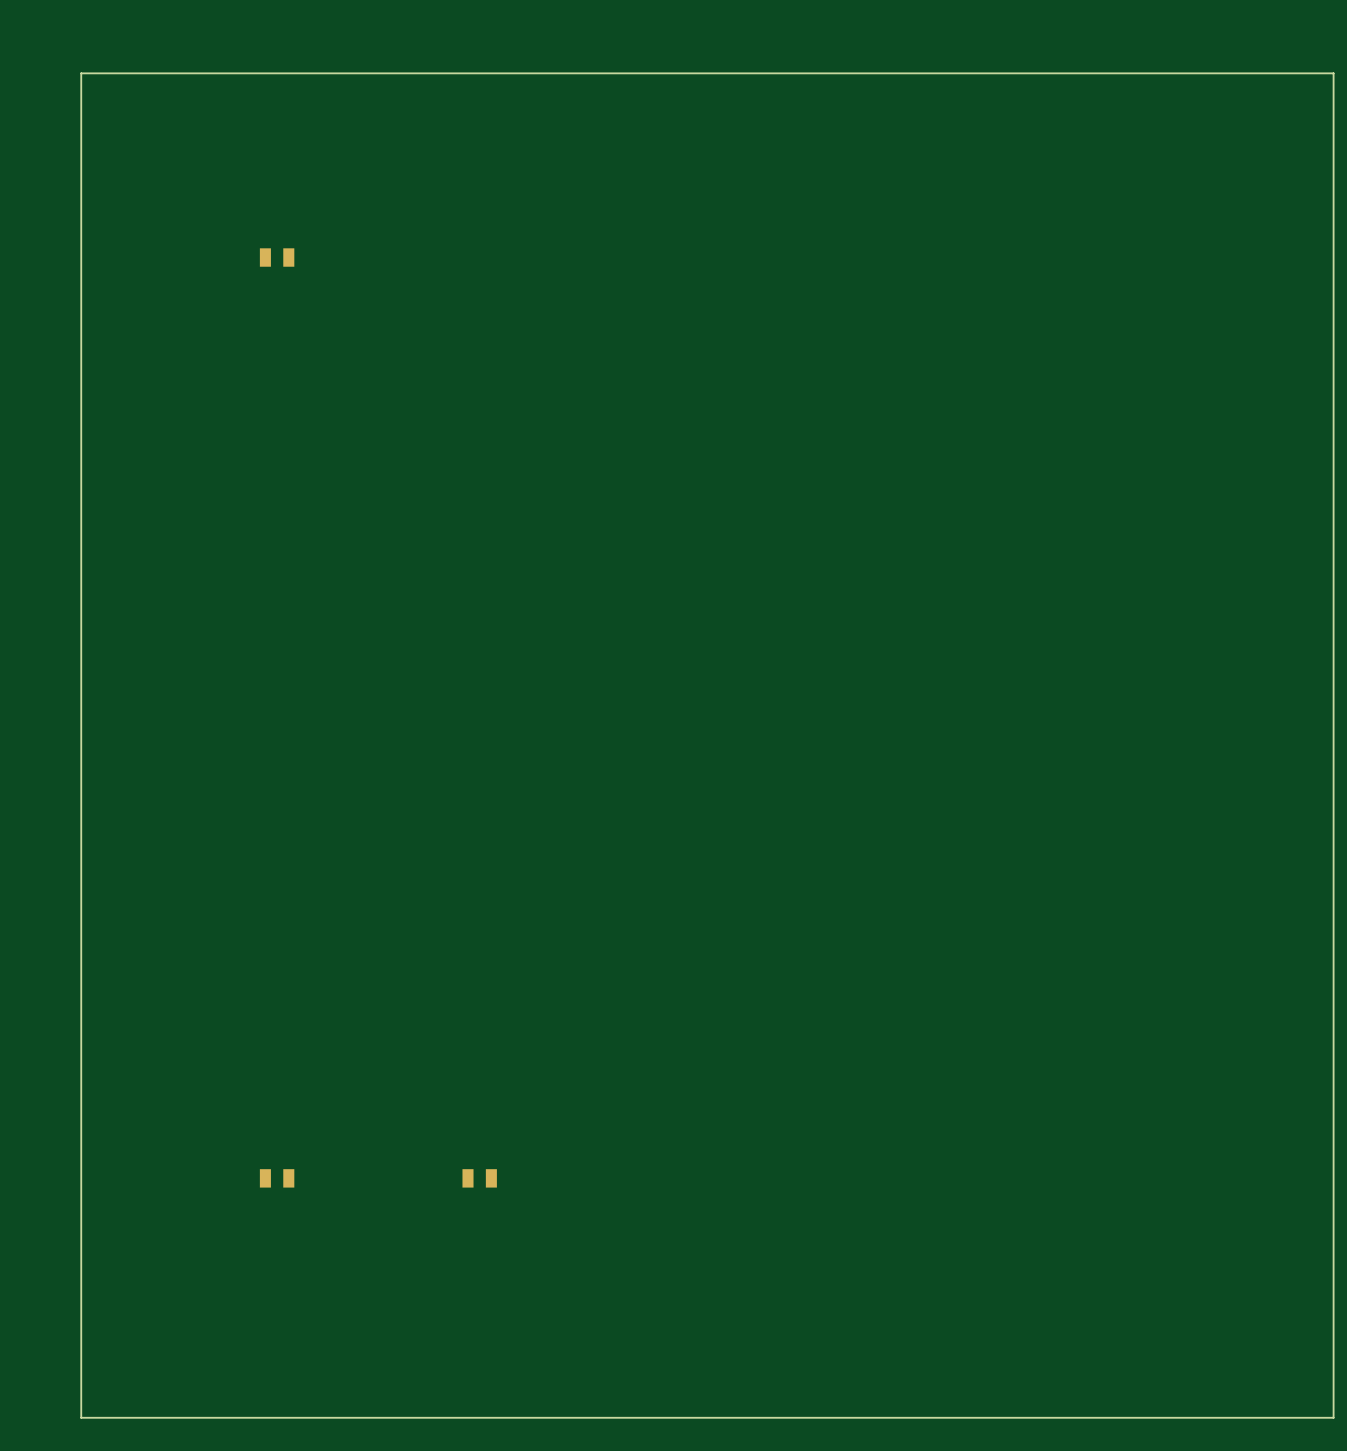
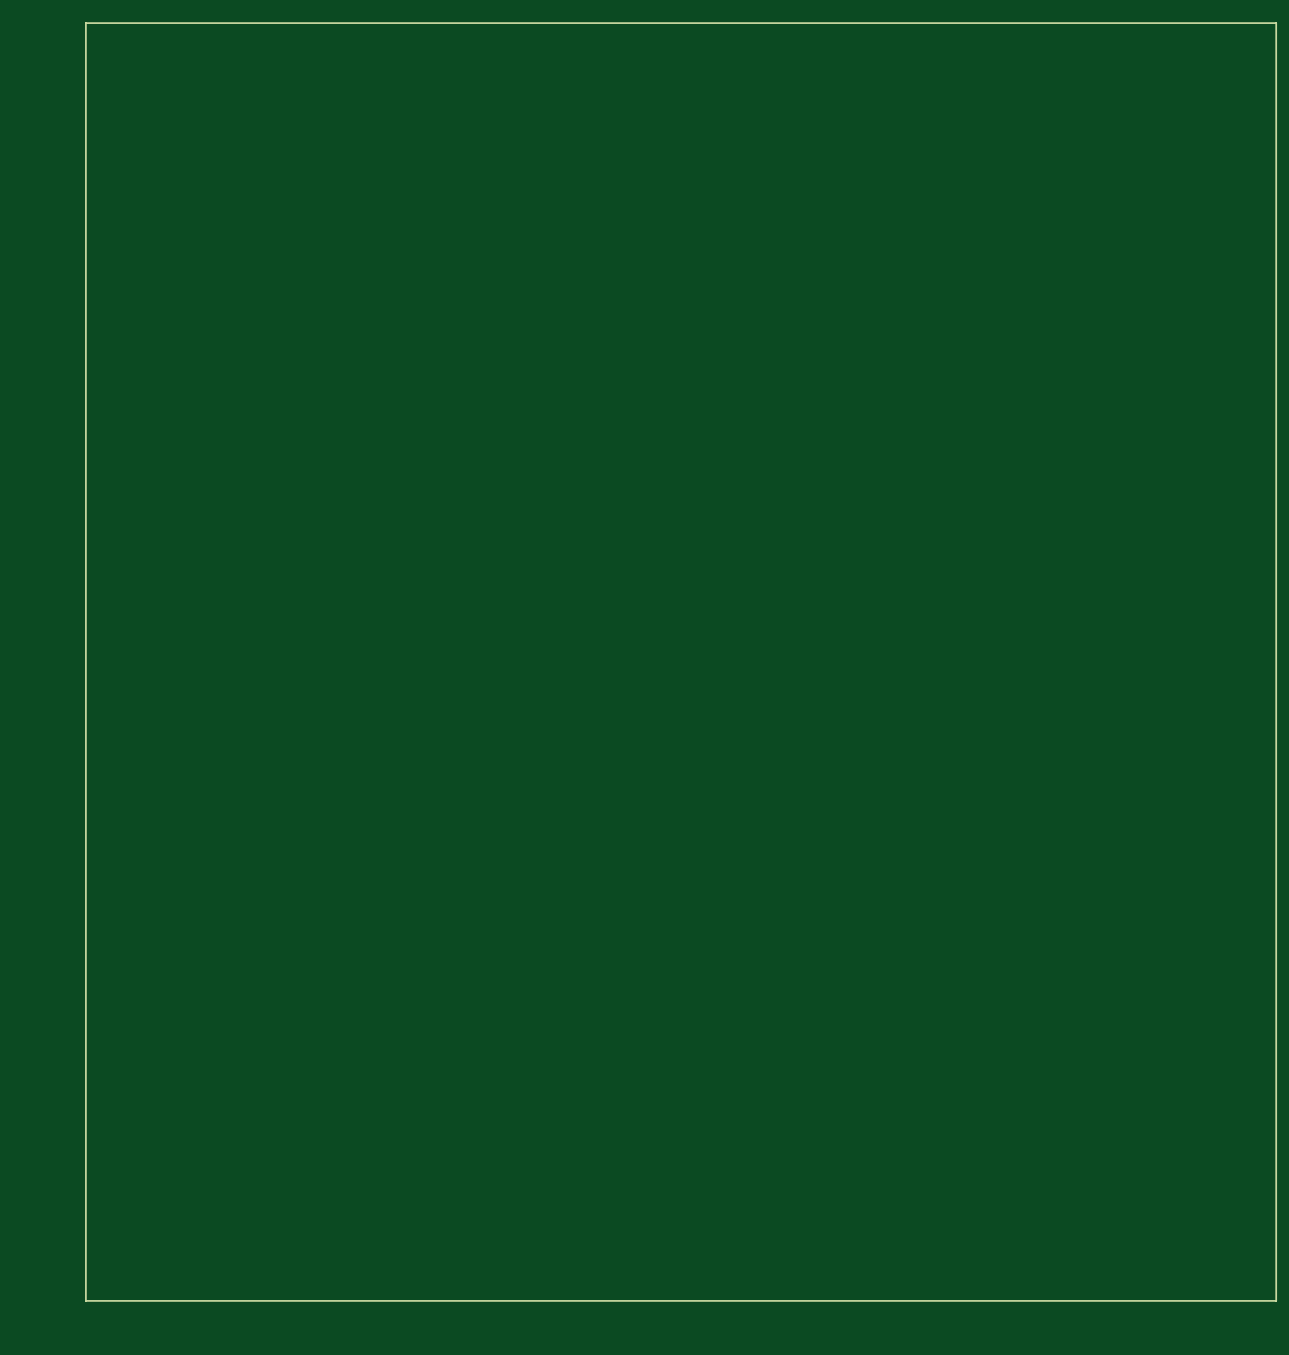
part: (277, 257) -> none
part: (277, 1178) -> none
part: (479, 1178) -> none

